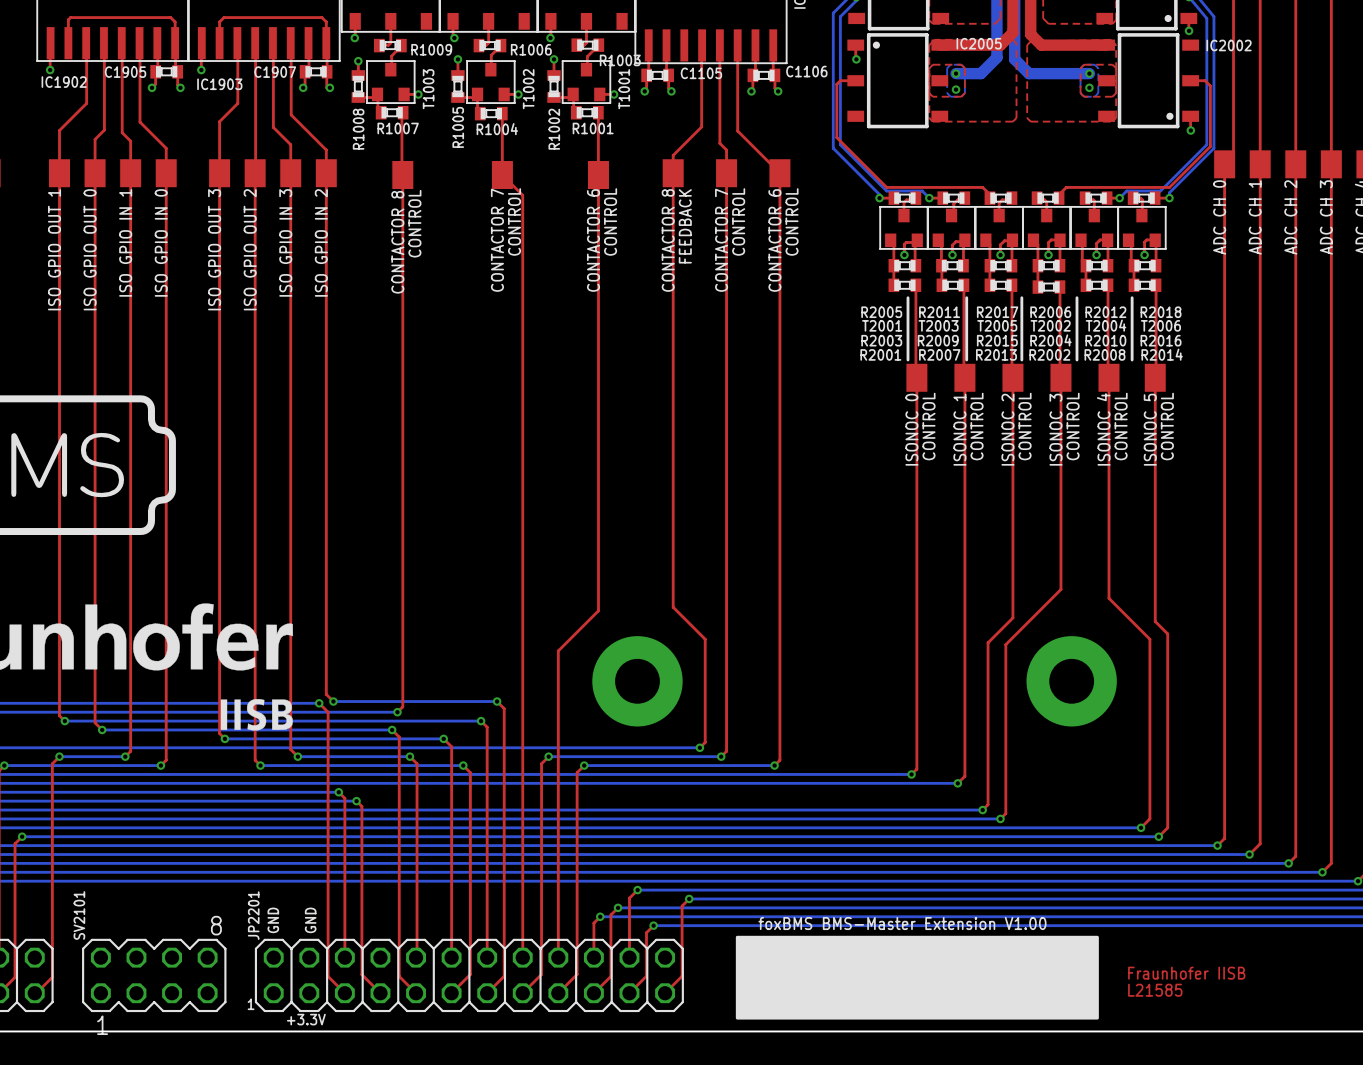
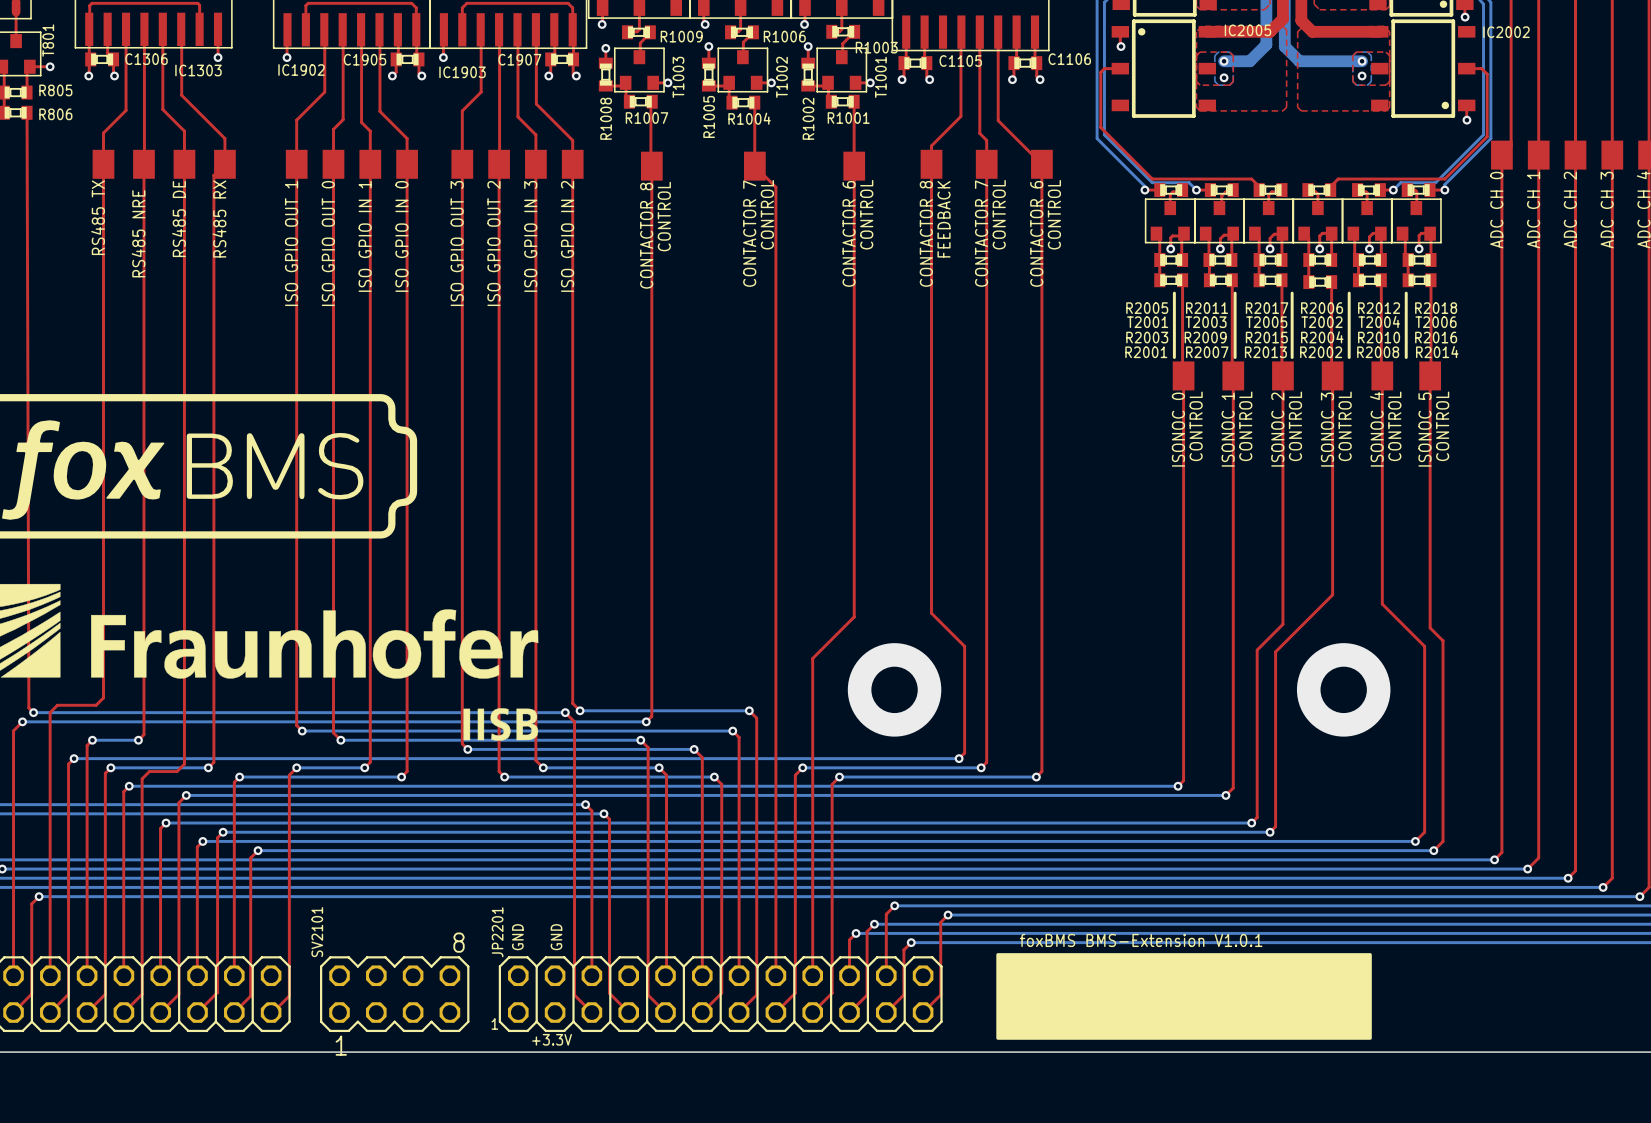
text: foxBMS BMS-Master Extension V1.00 (902, 923) -> foxBMS BMS-Extension V1.0.1 (1141, 940)
text: Fraunhofer IISB (1186, 973) -> none
text: L21585 (1155, 990) -> none

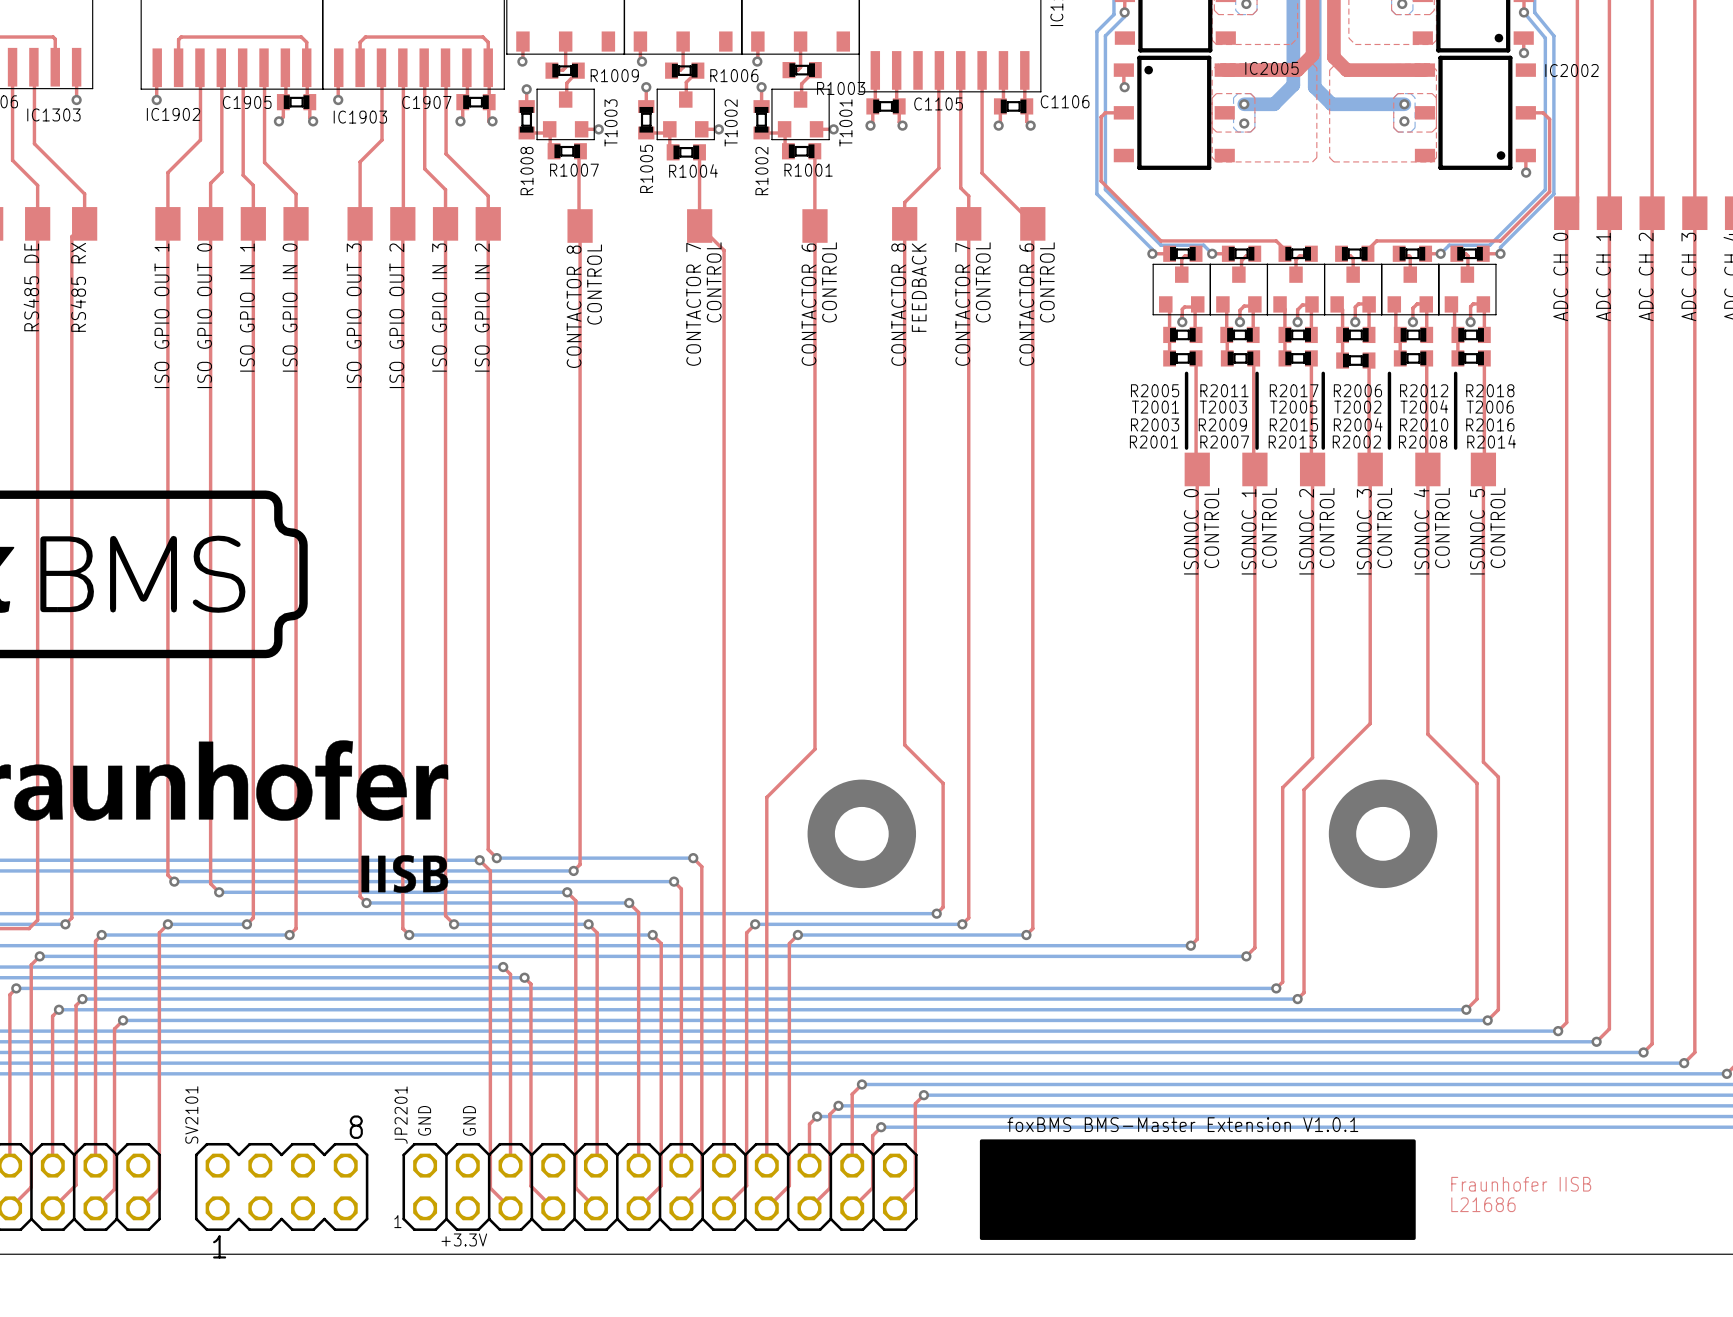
text: foxBMS BMS-Extension V1.0.1 (1141, 940) -> foxBMS BMS-Master Extension V1.0.1 (1182, 1124)
text: none -> Fraunhofer IISB (1521, 1184)
text: none -> L21686 (1483, 1204)

